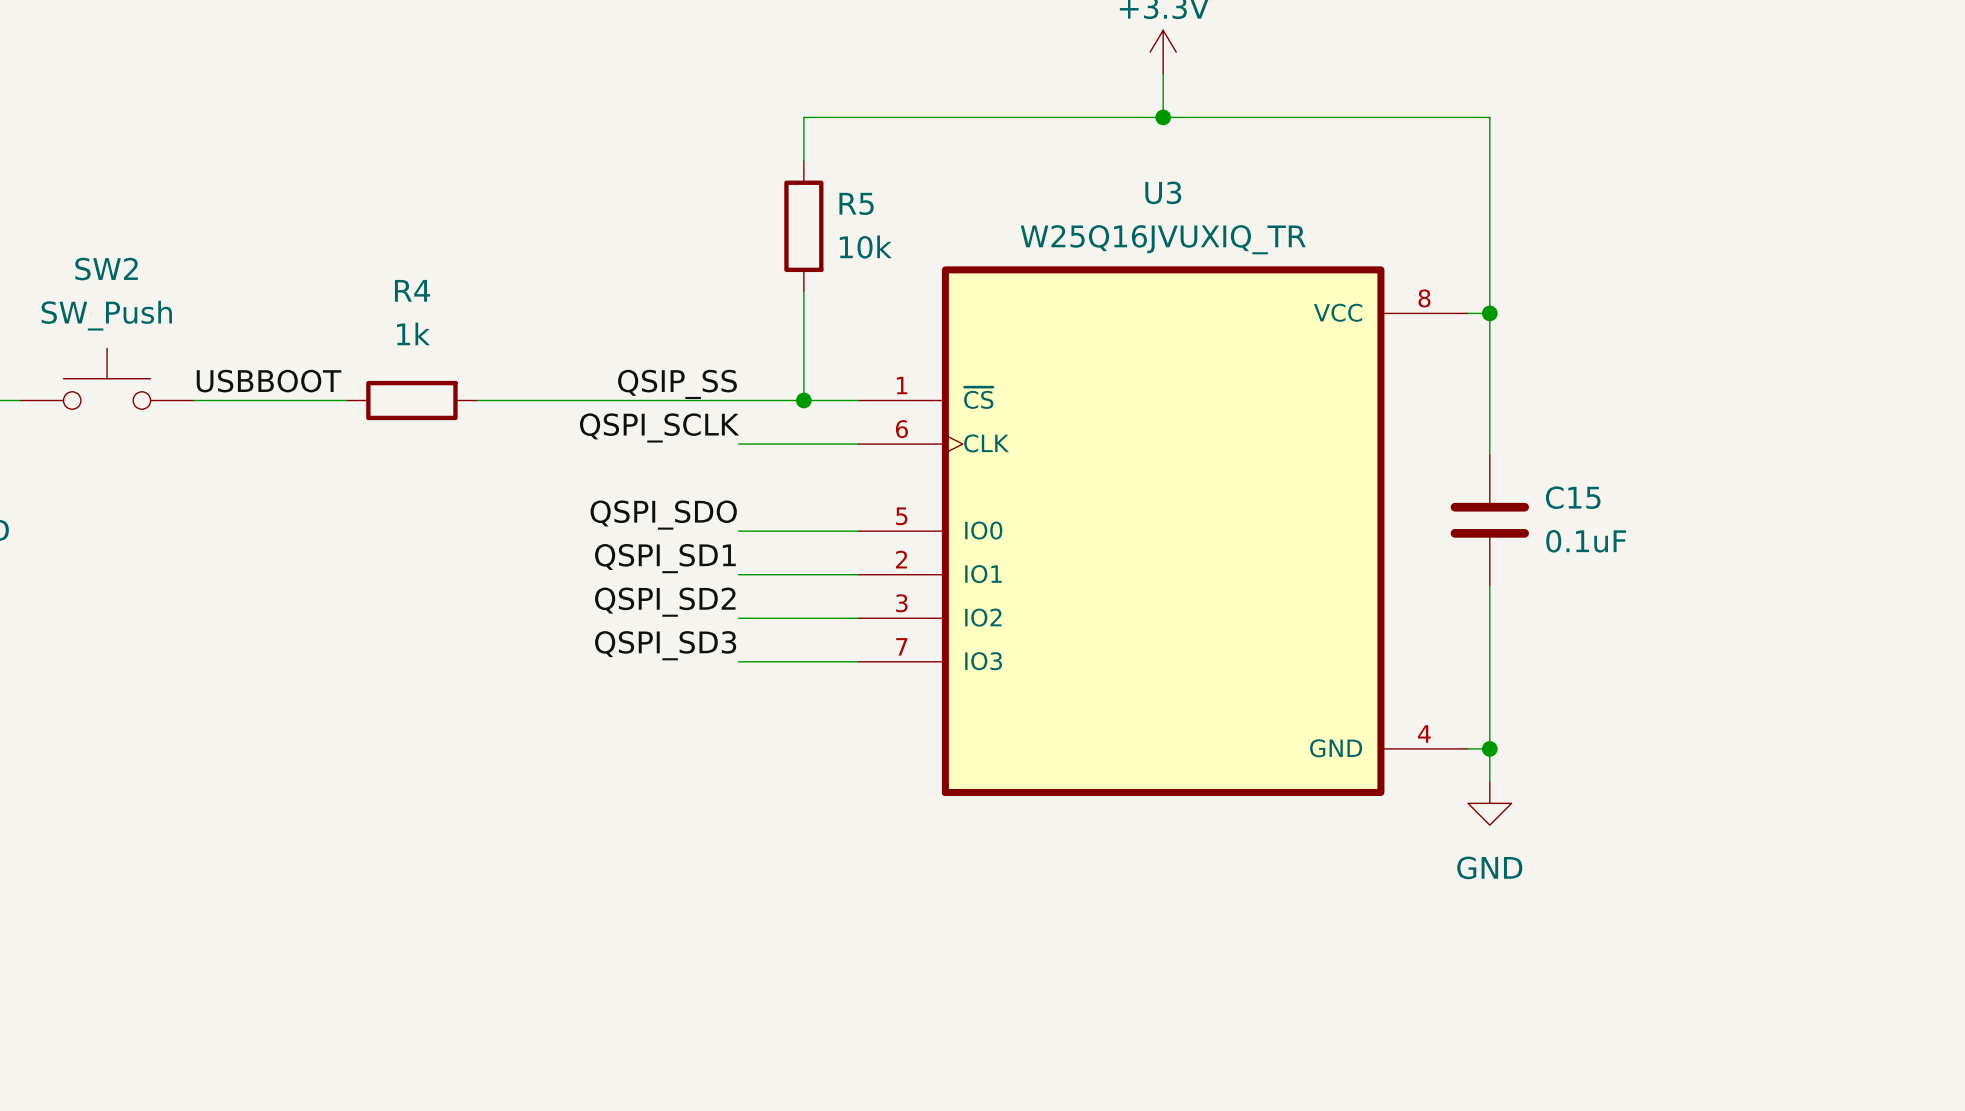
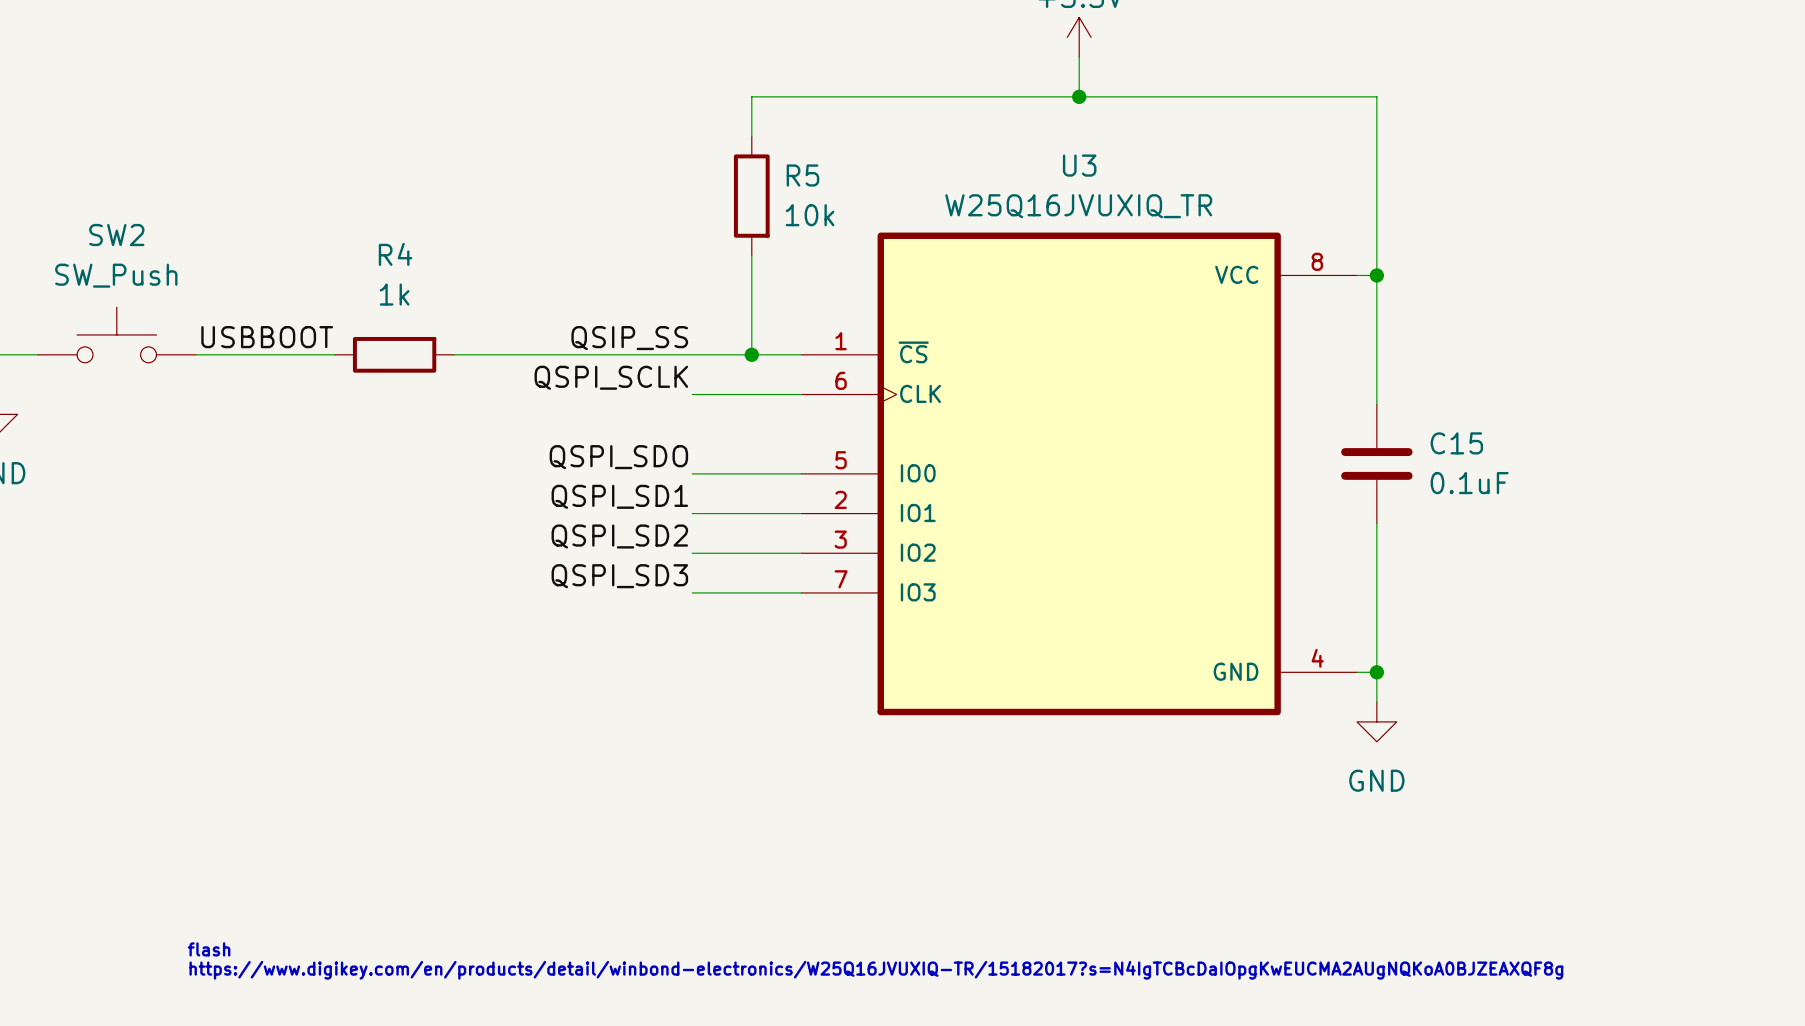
text: none -> flash (209, 949)
text: none -> https://www.digikey.com/en/products/detail/winbond-electronics/W25Q16JVUXIQ-TR/15182017?s=N4IgTCBcDaIOpgKwEUCMA2AUgNQKoA0BJZEAXQF8g (876, 970)

